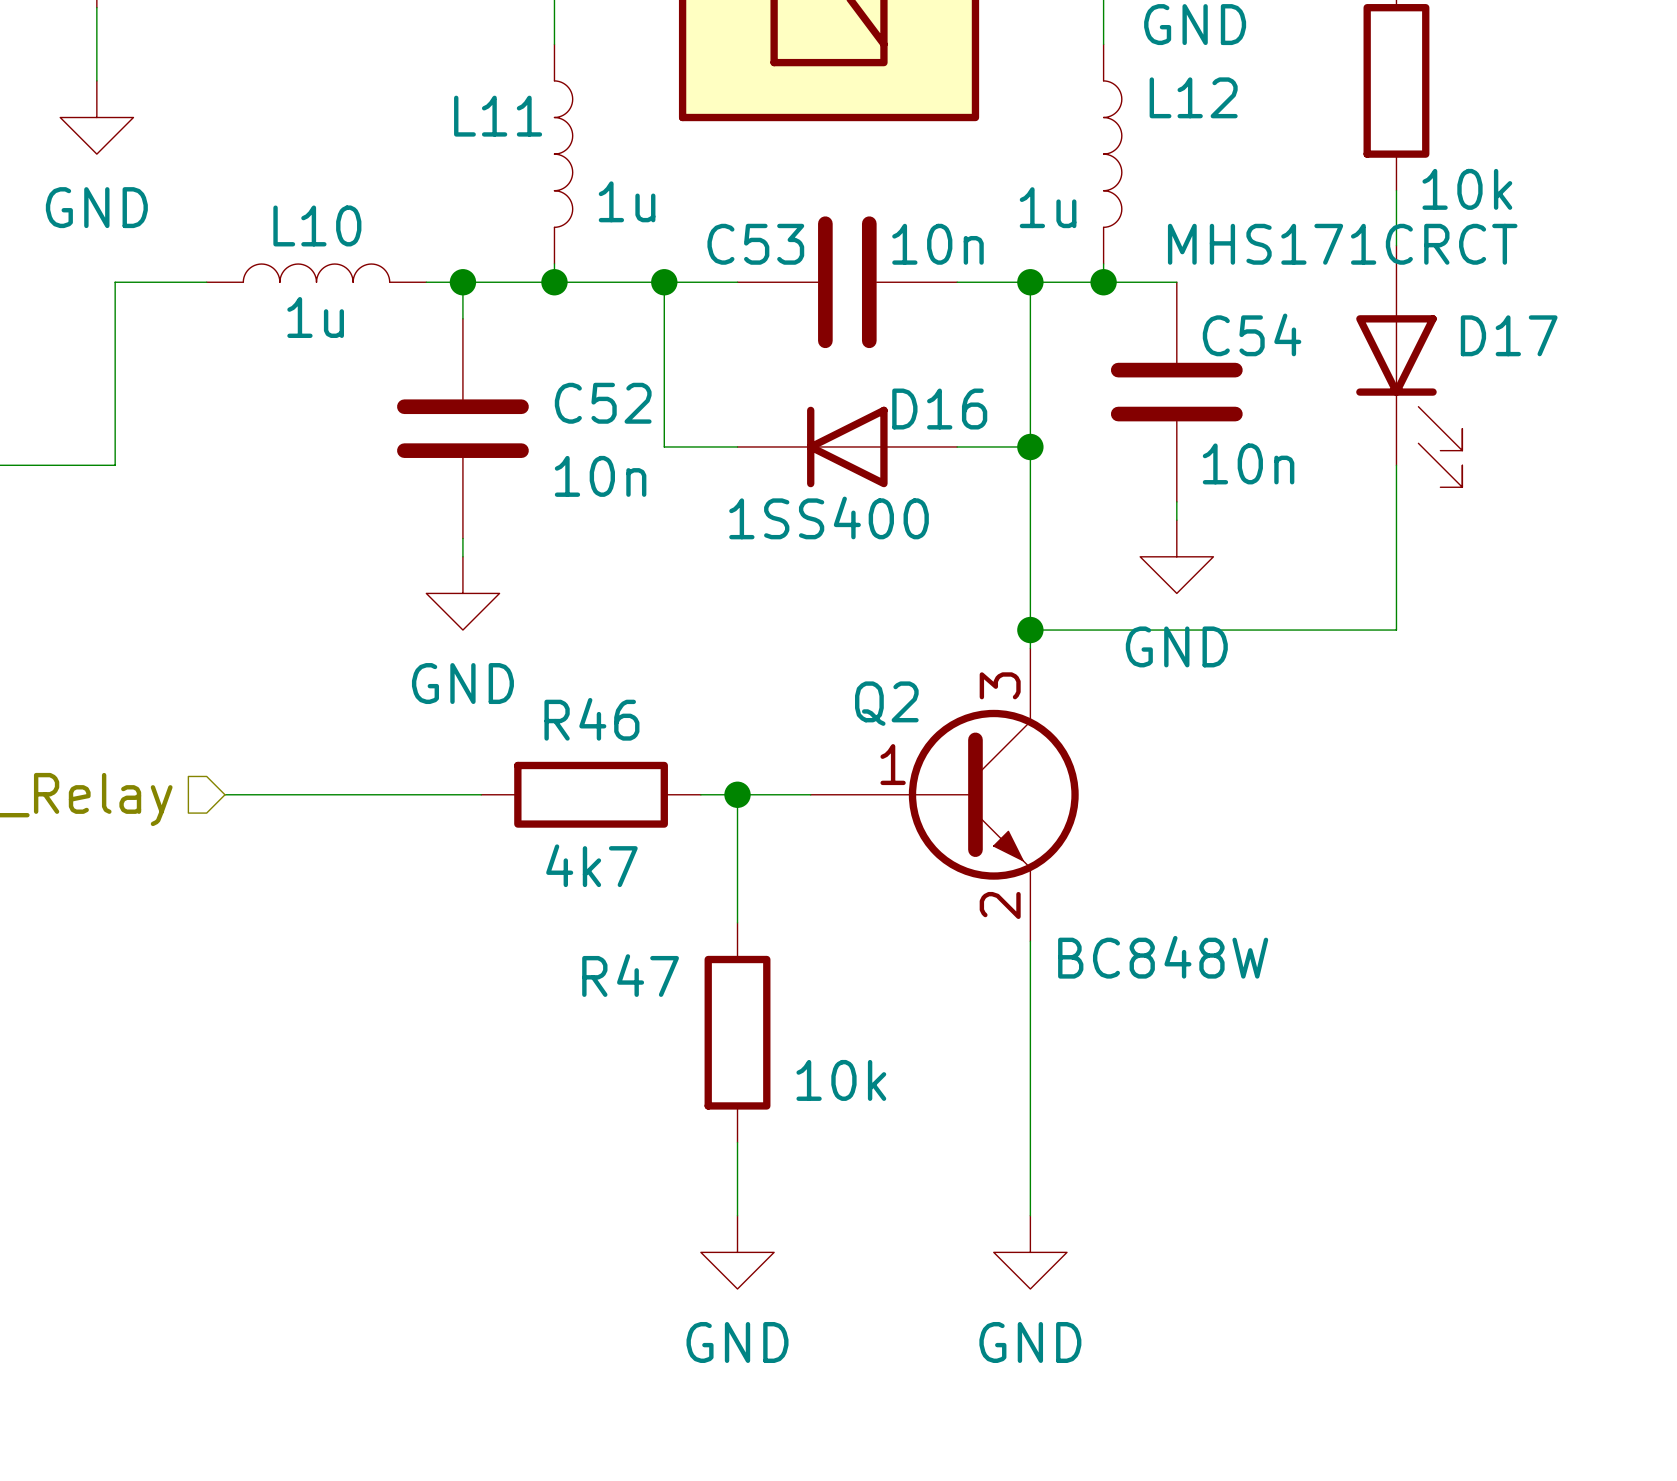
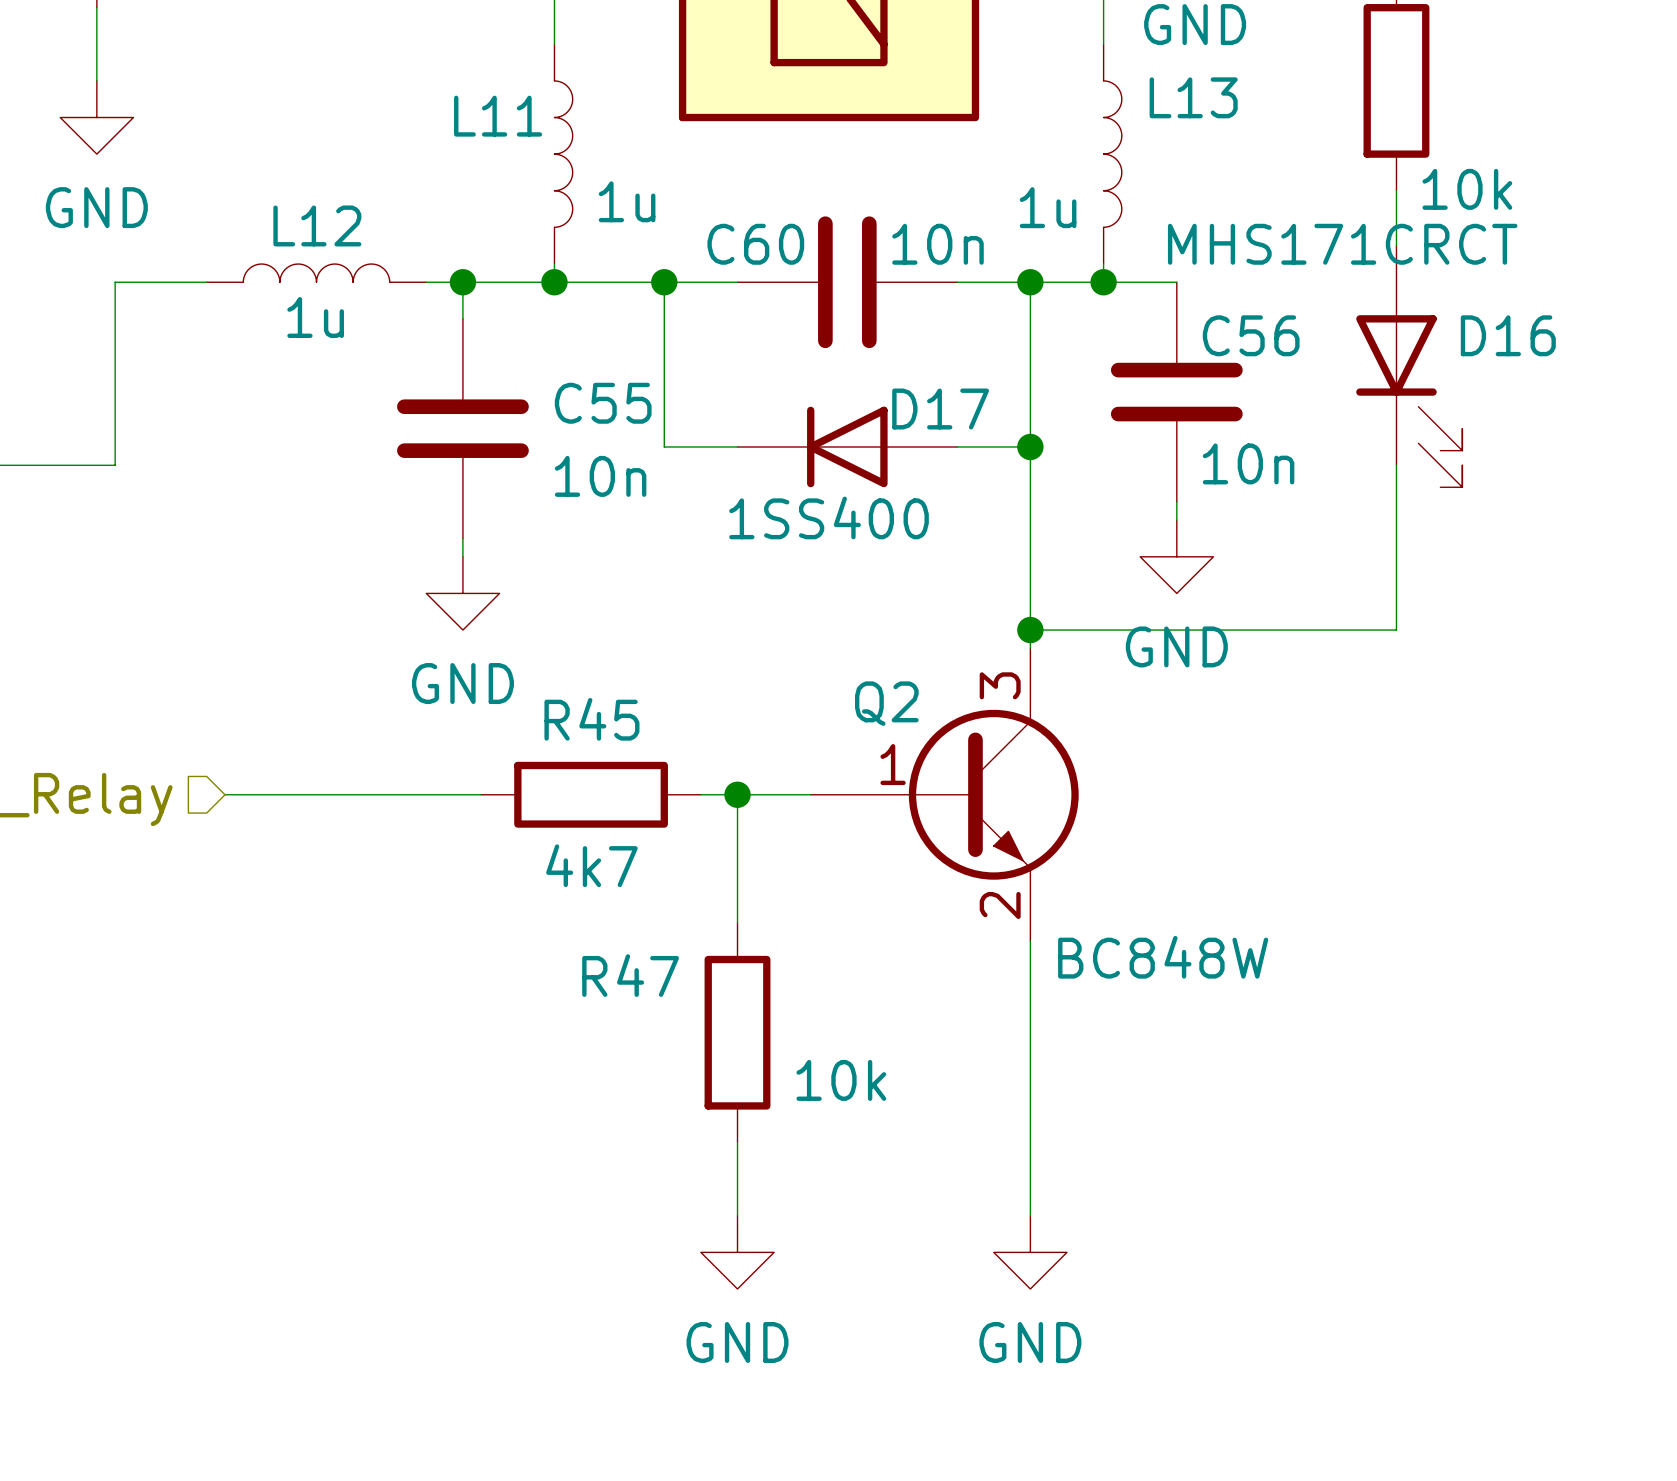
L12 name: L12 (1193, 97) -> L13 (1193, 97)
L10 name: L10 (317, 225) -> L12 (317, 225)
C53 name: C53 (755, 244) -> C60 (755, 244)
C54 name: C54 (1252, 334) -> C56 (1251, 335)
D17 name: D17 (1509, 335) -> D16 (1508, 335)
C52 name: C52 (603, 403) -> C55 (603, 403)
D16 name: D16 (939, 409) -> D17 (940, 409)
R46 name: R46 (591, 719) -> R45 (591, 719)

